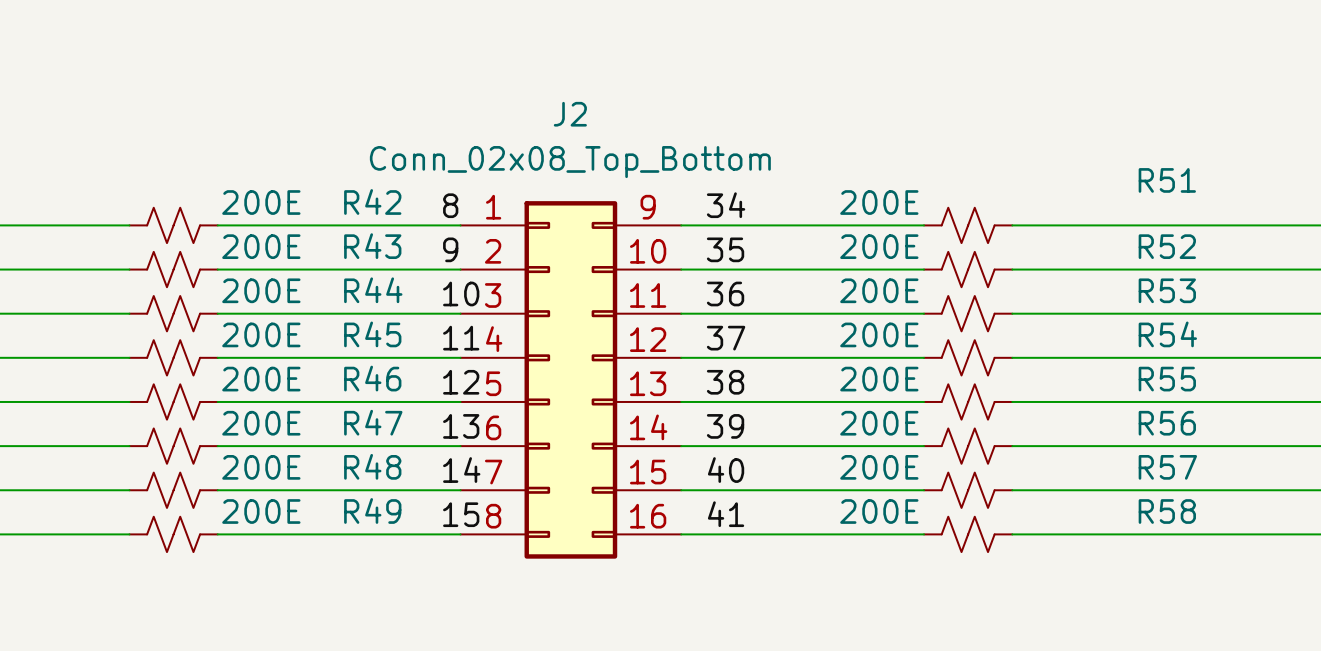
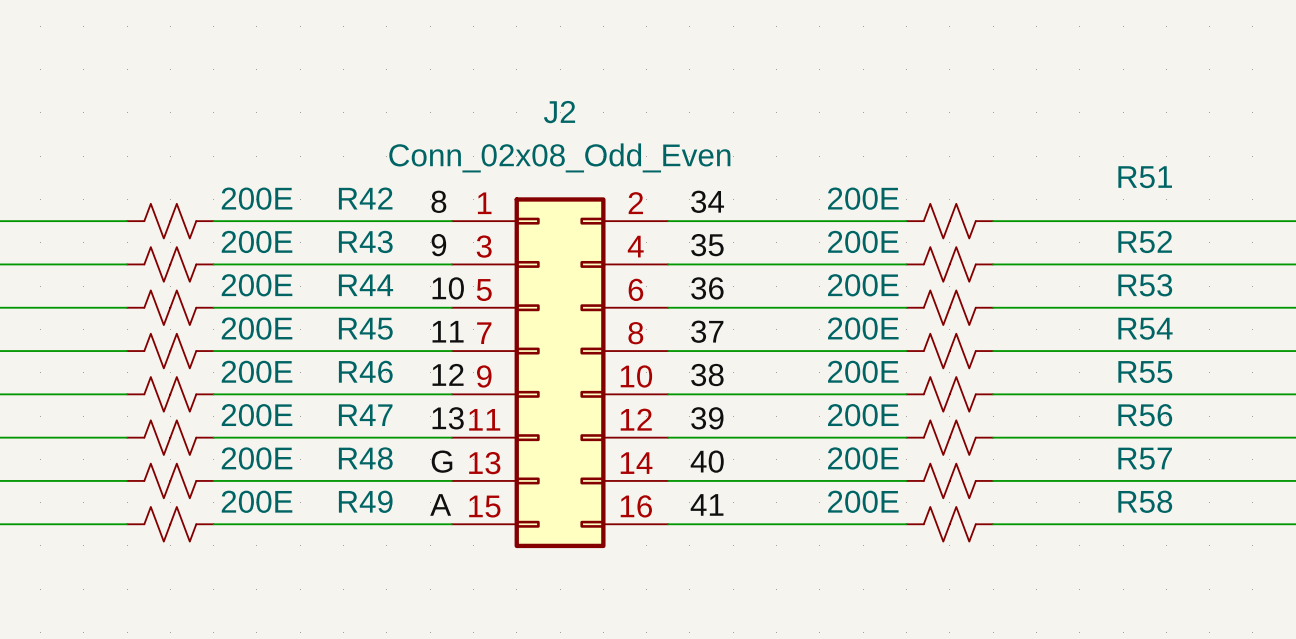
J2 value: Conn_02x08_Top_Bottom (570, 162) -> Conn_02x08_Odd_Even (559, 157)
J2 symbol: [460, 201, 682, 559] -> [451, 197, 669, 549]
label: 14 (461, 470) -> G (441, 461)
label: 15 (461, 514) -> A (440, 504)

